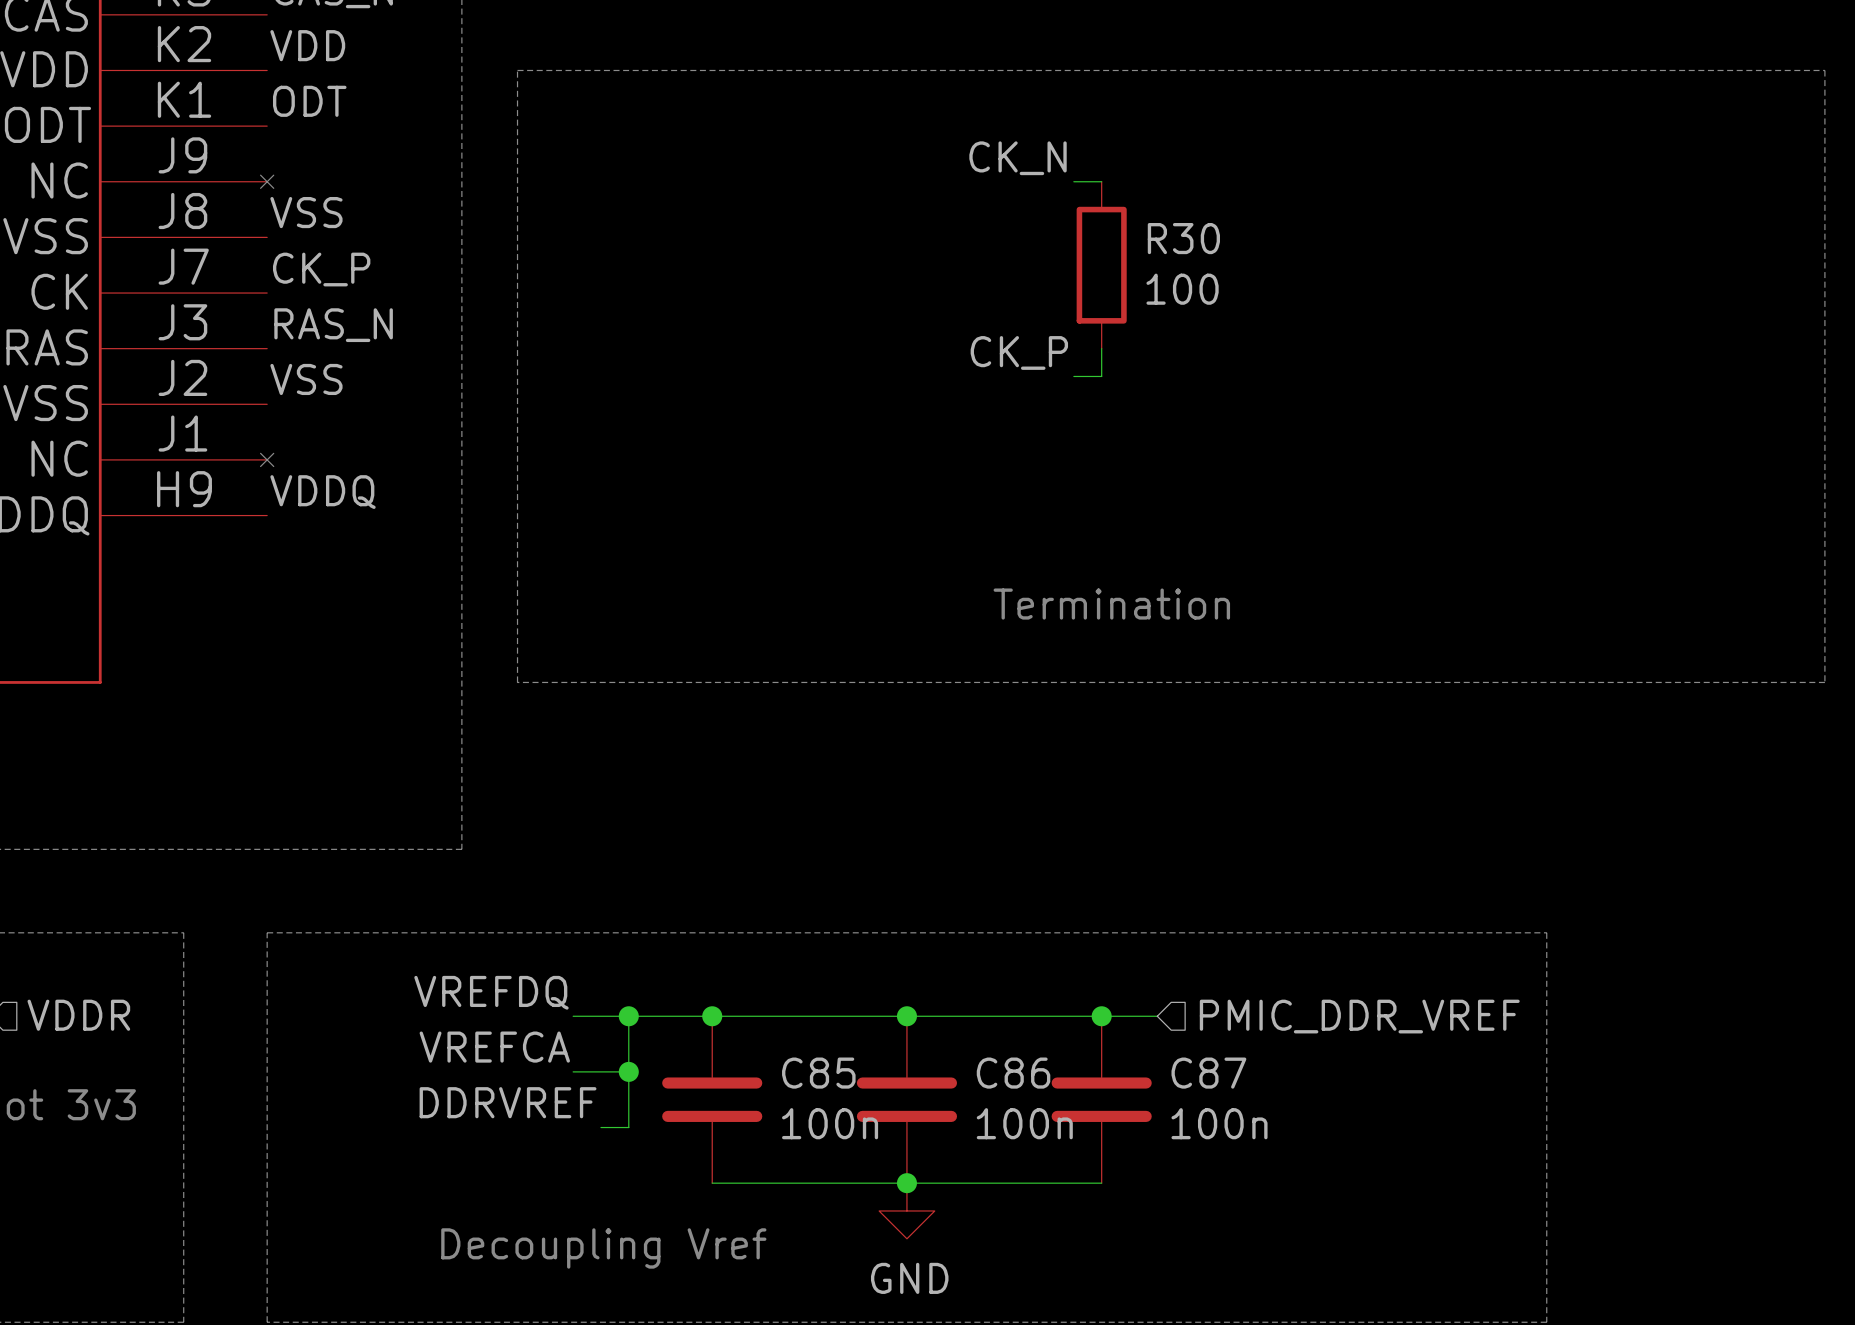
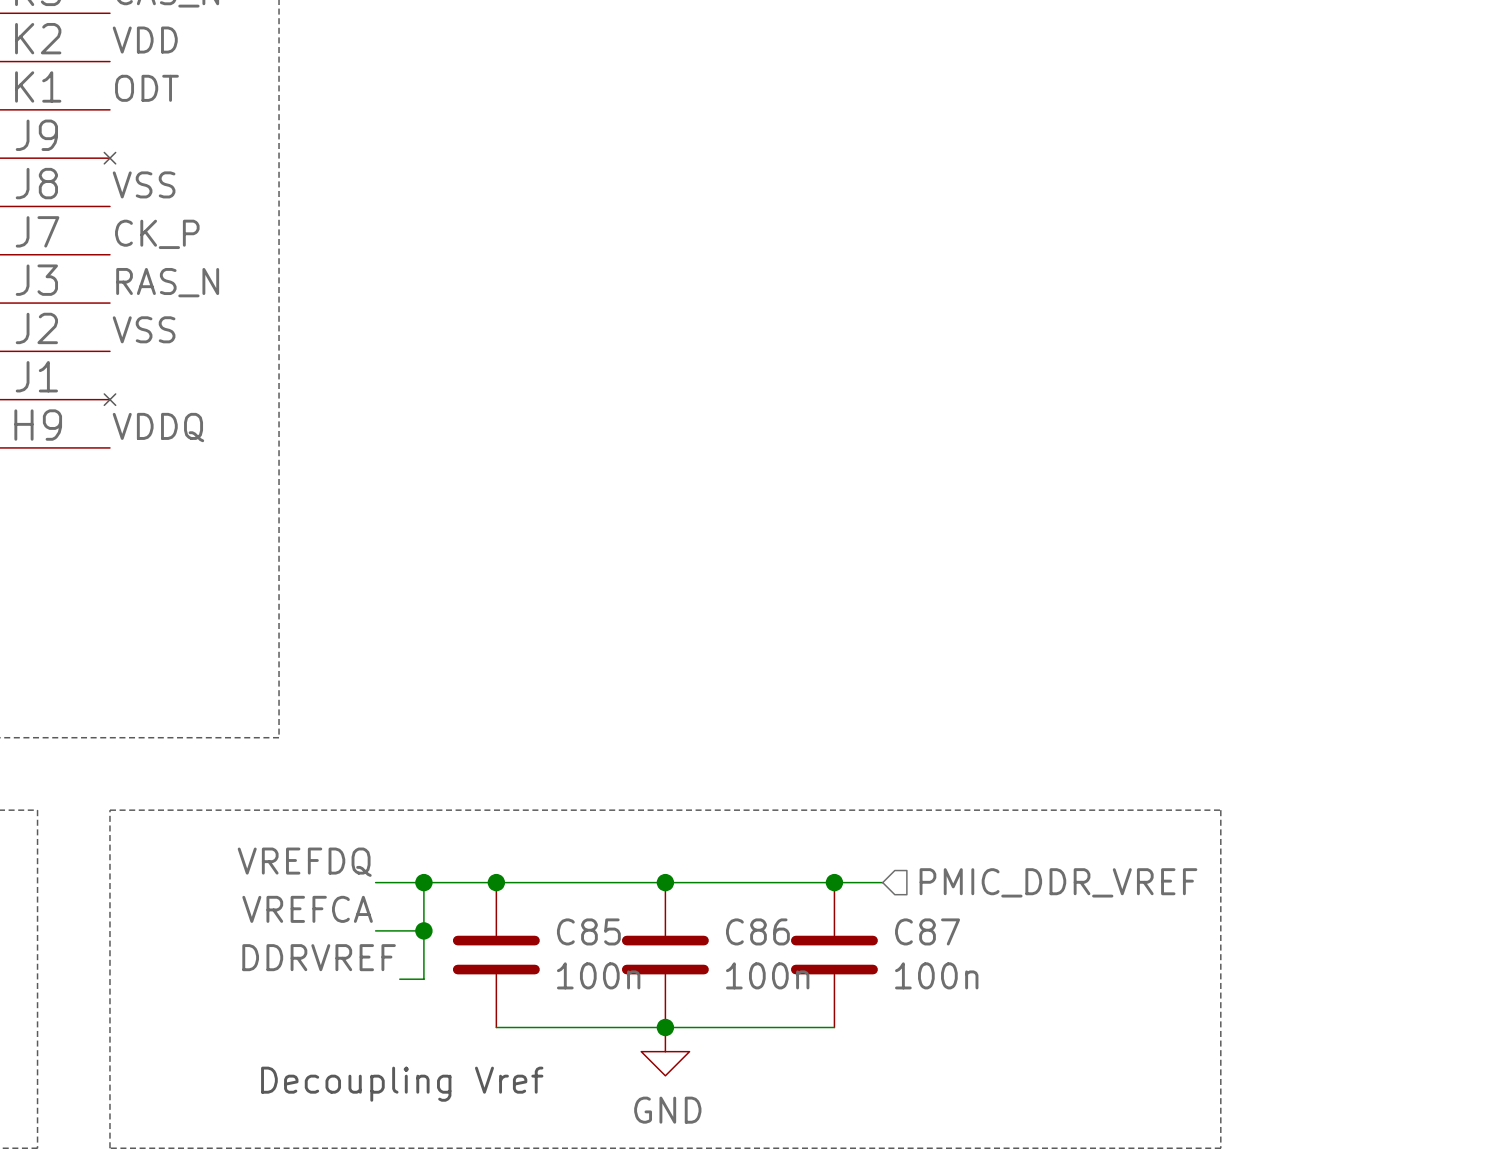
line: (517, 70) (1824, 70) (1824, 682) (517, 682) (517, 70) -> none
label: CK_N (1018, 158) -> none
wire: (1073, 181) (1101, 181) -> none
R30: 100 (1101, 265) -> none
wire: (1101, 348) (1101, 376) (1073, 376) -> none
label: CK_P (1019, 352) -> none
text: Termination (1111, 604) -> none

